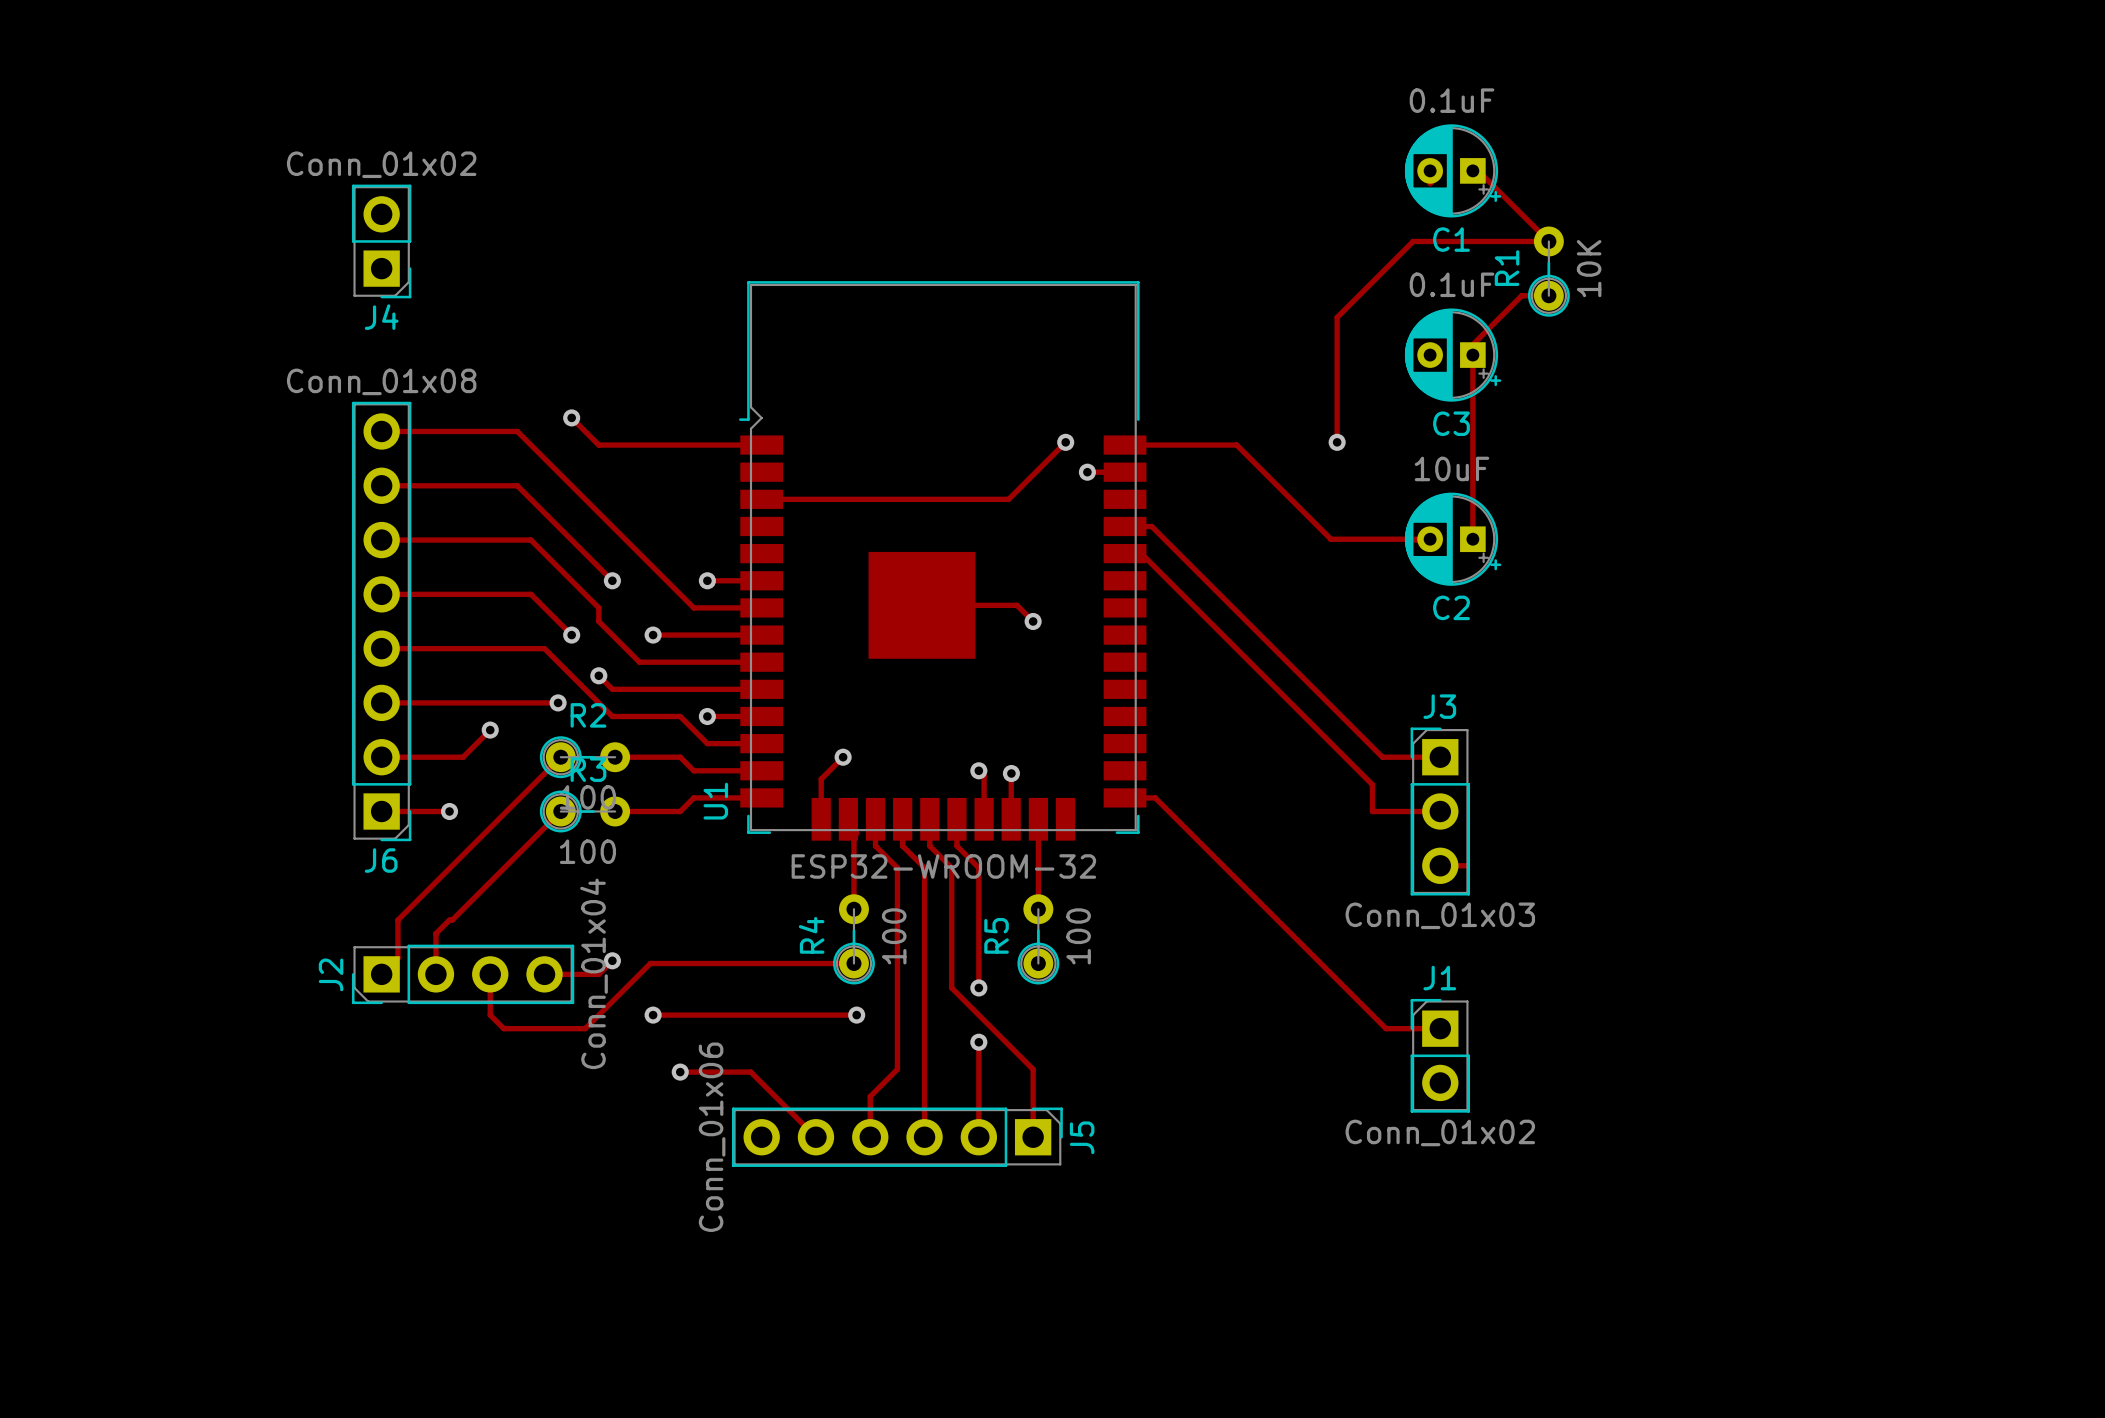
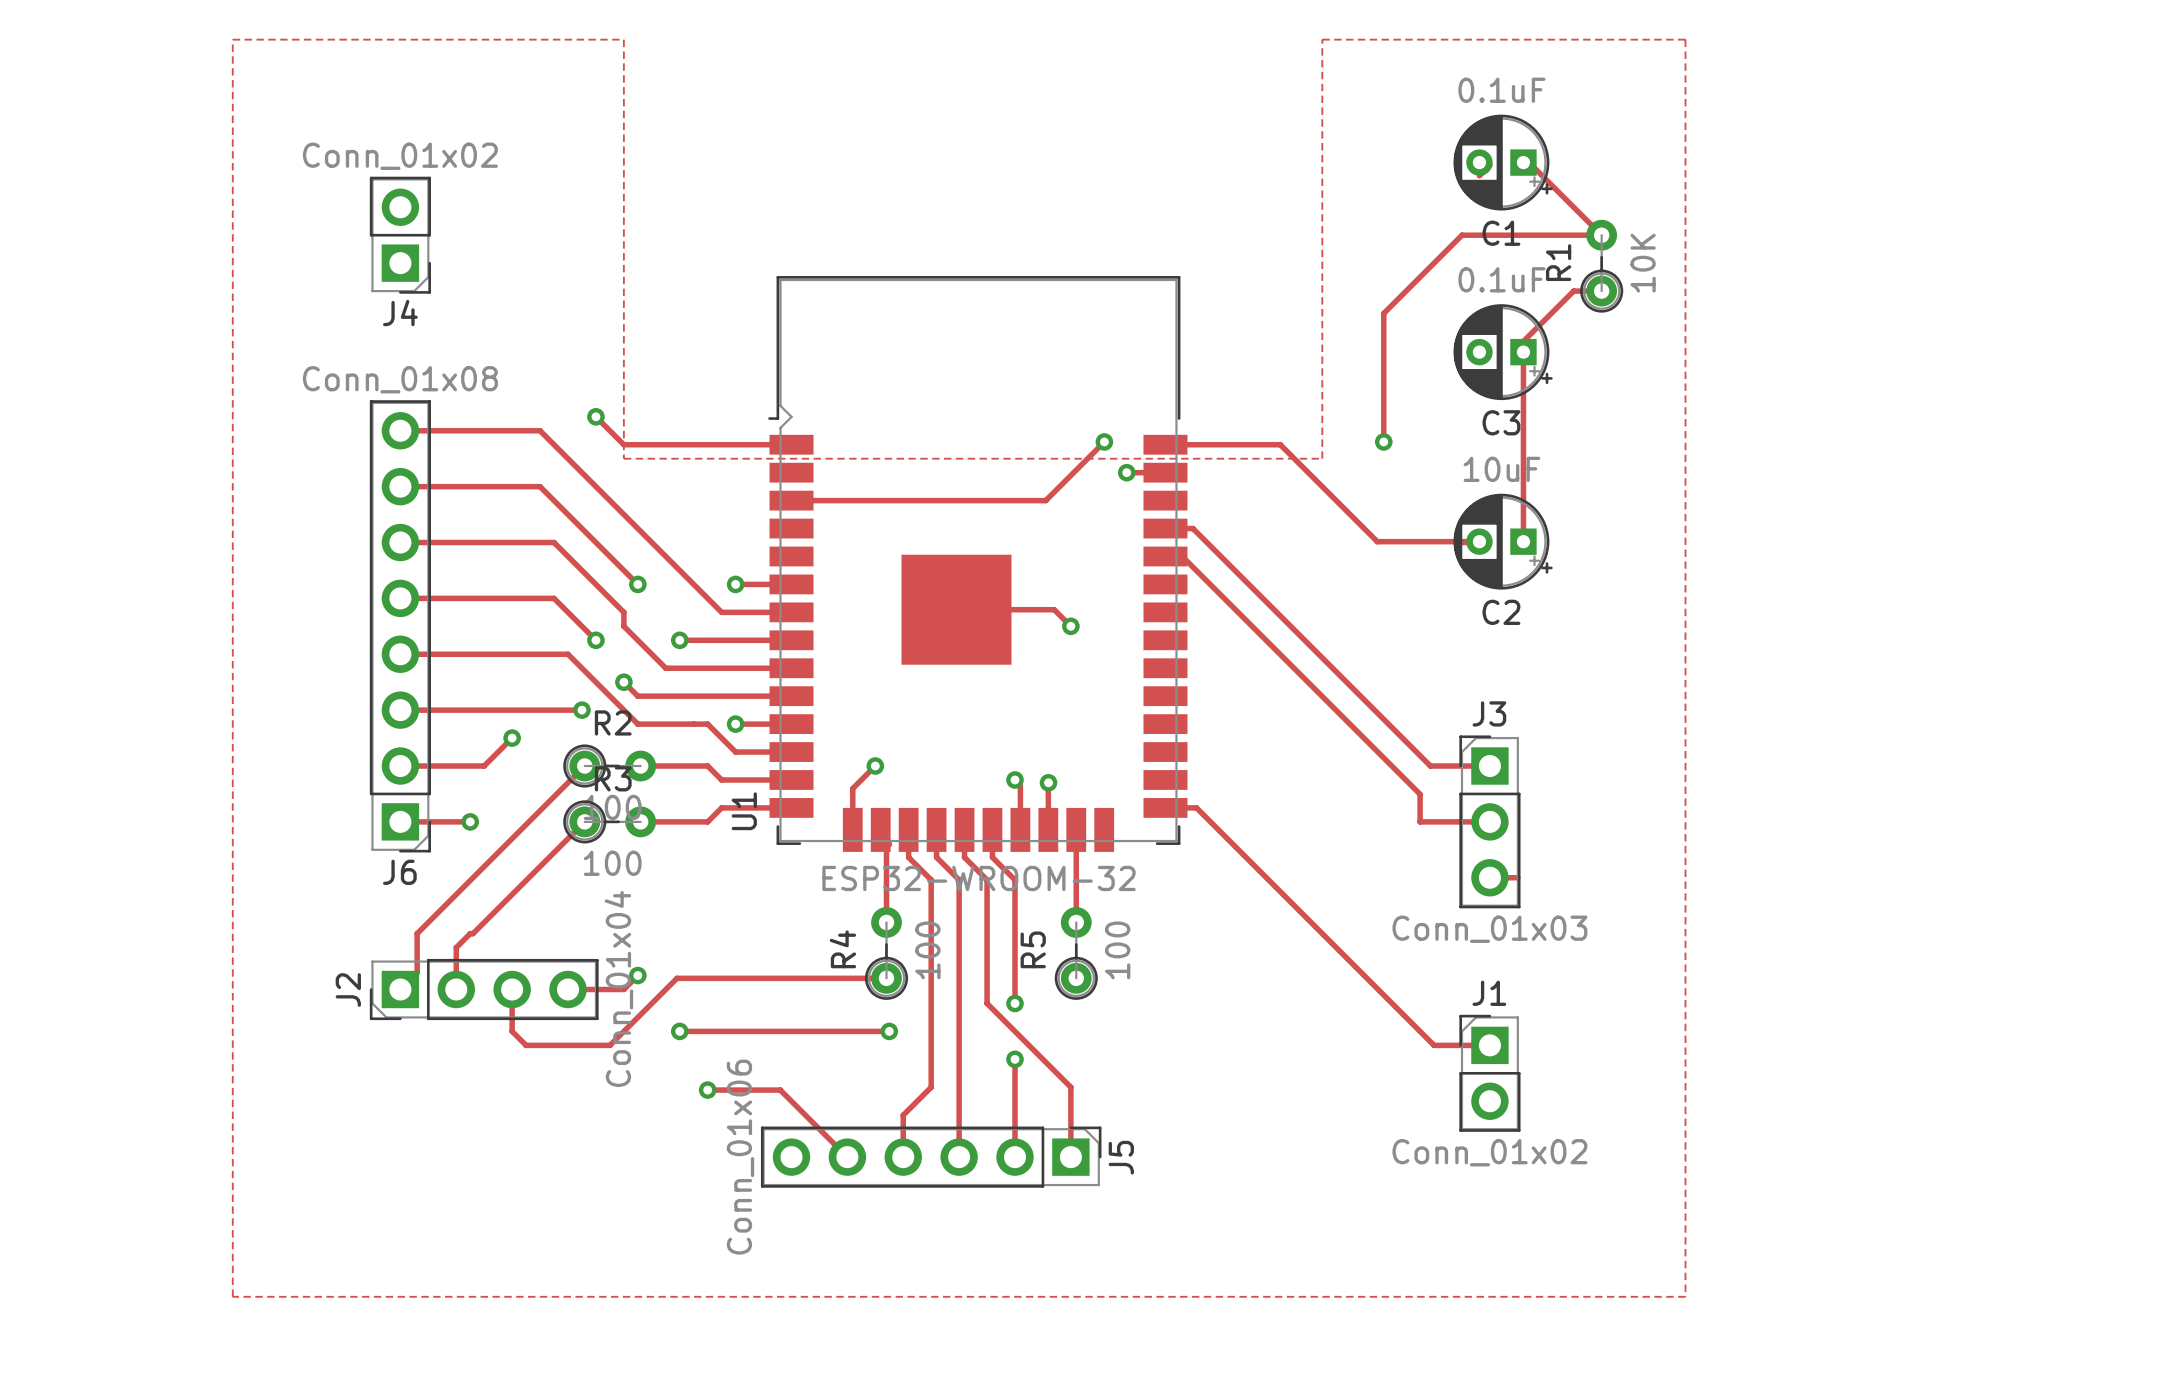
zone outline: none -> (232, 39) (623, 39) (623, 458) (1322, 458) (1322, 39) (1685, 39) (1685, 1296) (232, 1296) (232, 39)

